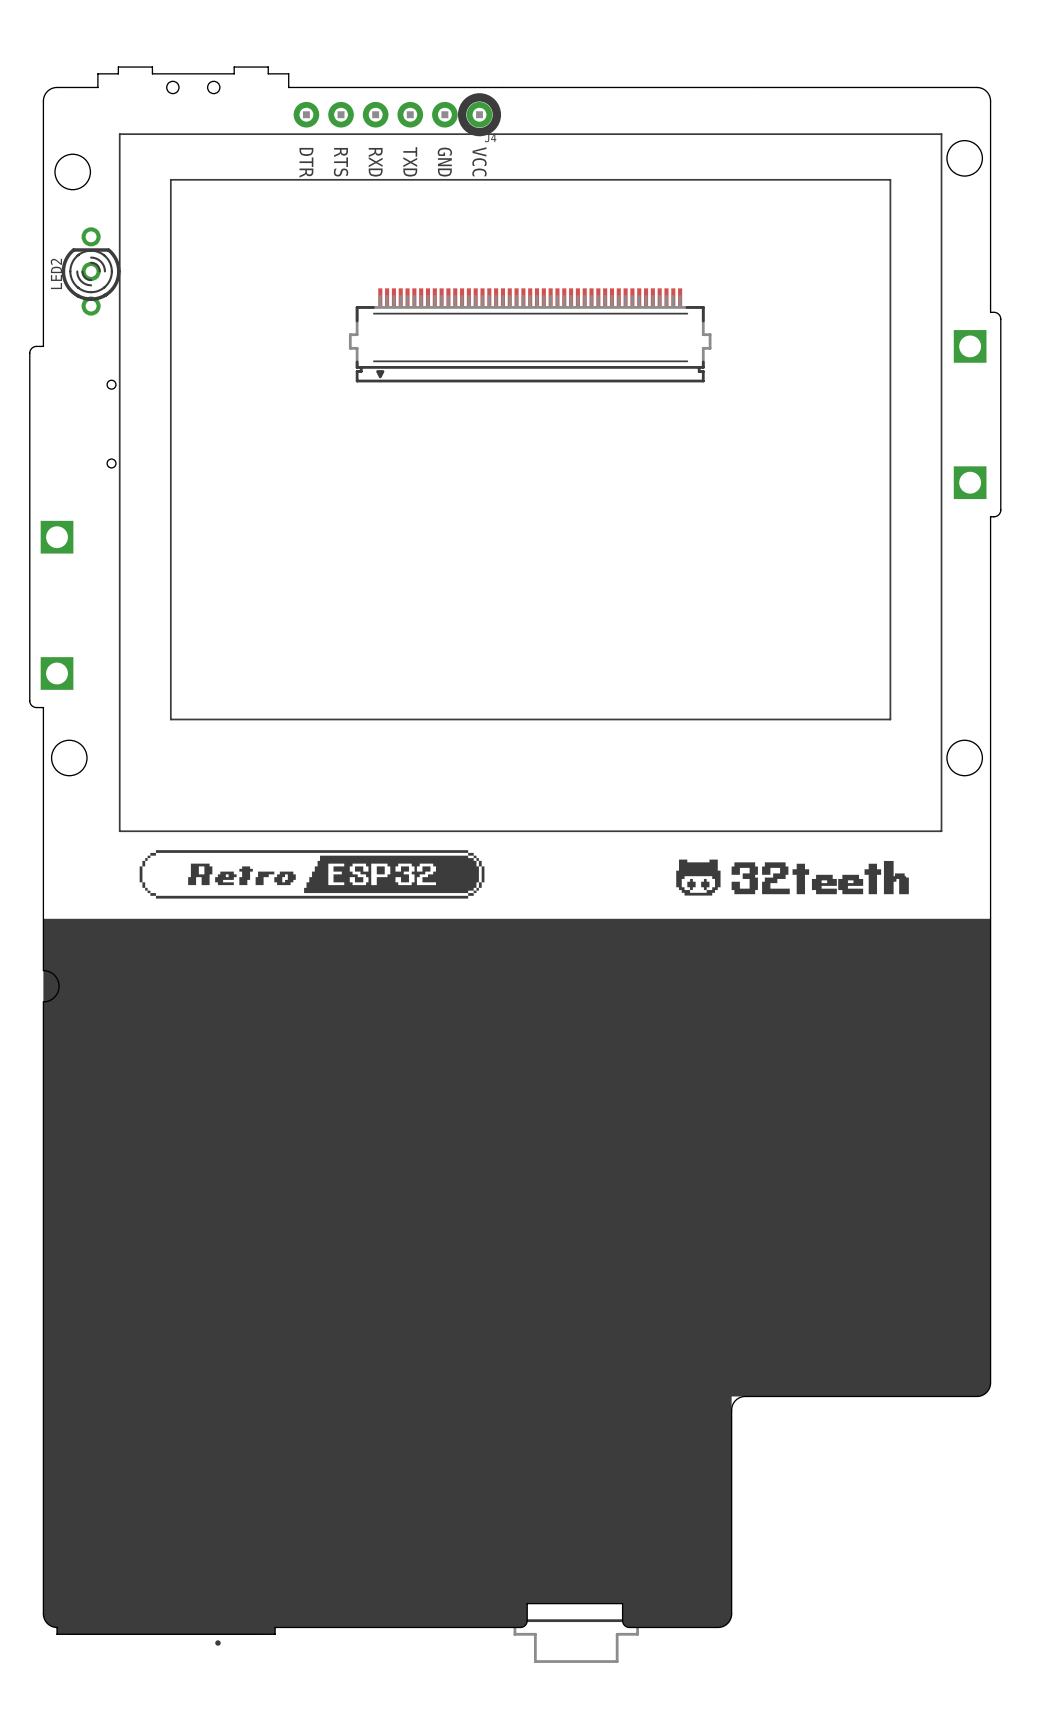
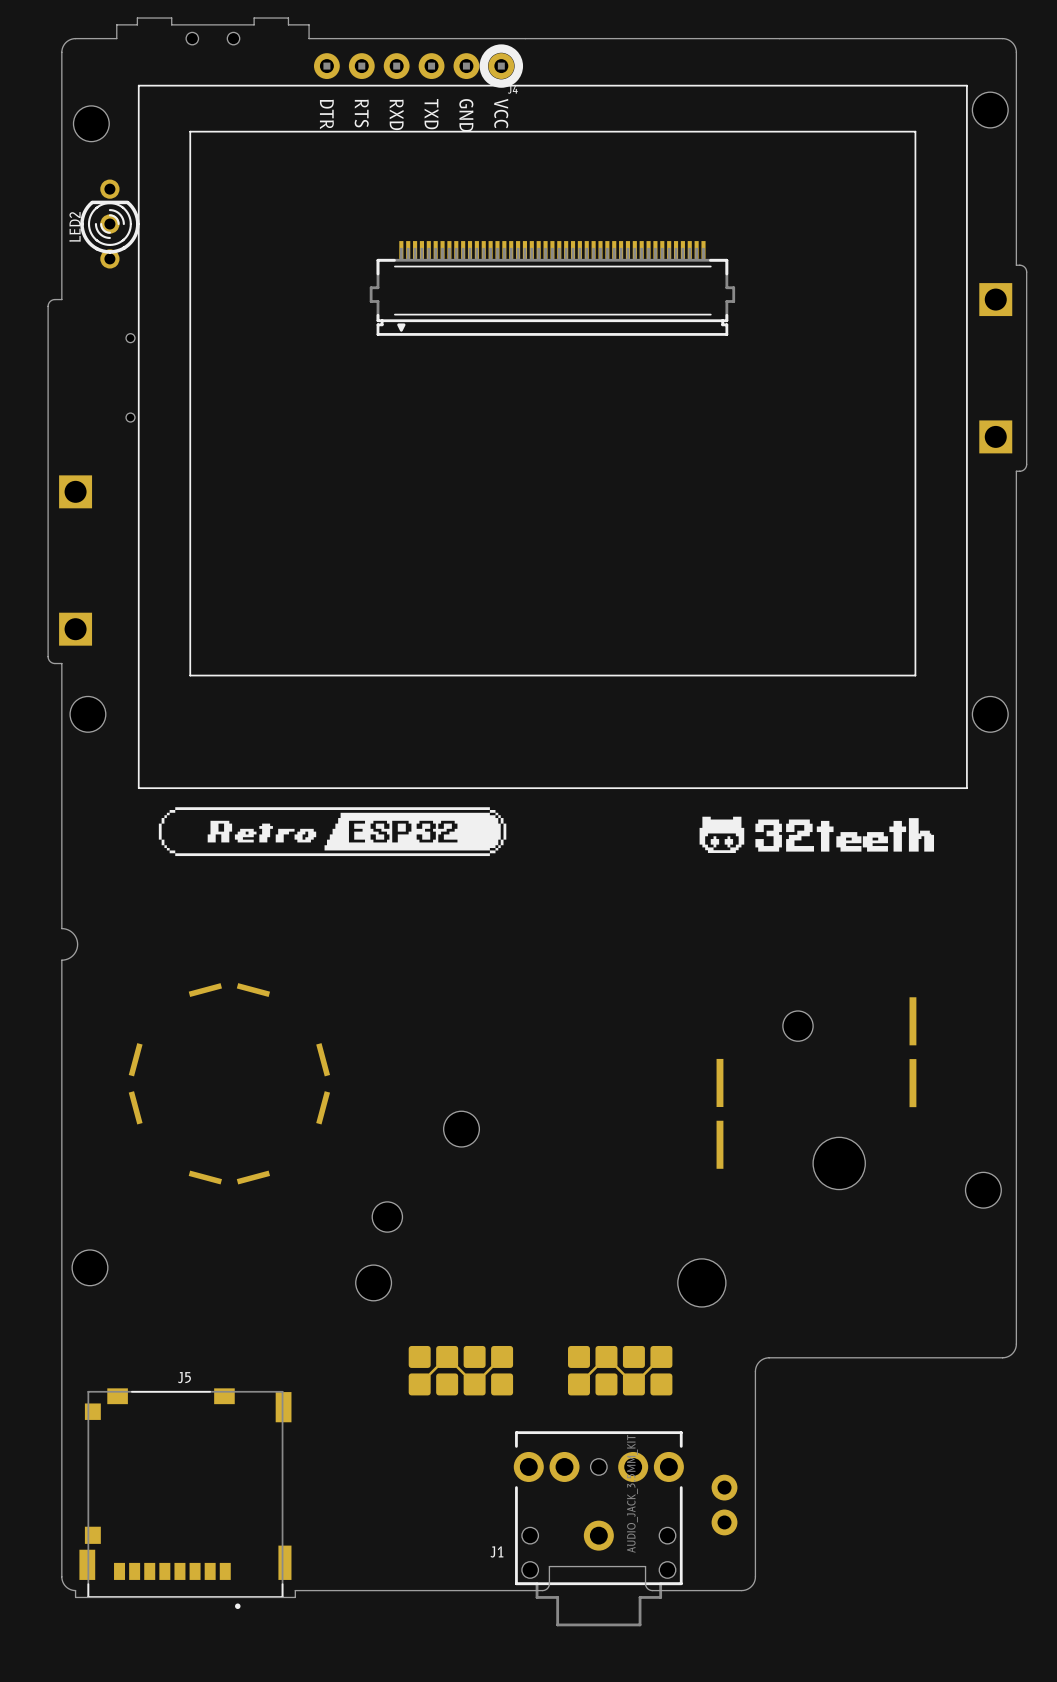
drawing: [43, 918, 991, 1635] -> none

